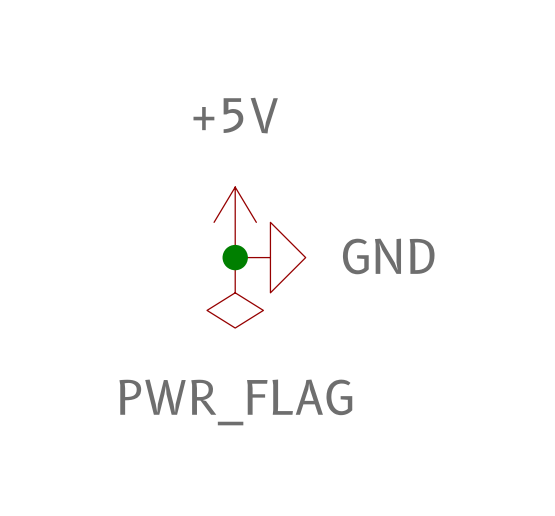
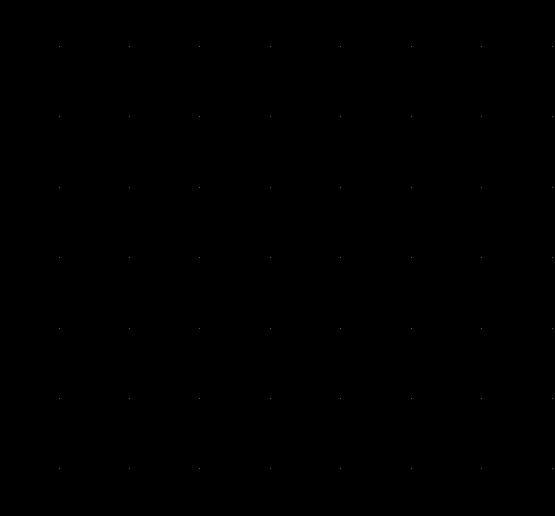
power symbol: +5V (235, 222) -> none
junction: (235, 257) -> none
power symbol: GND (270, 257) -> none
power symbol: PWR_FLAG (235, 292) -> none

